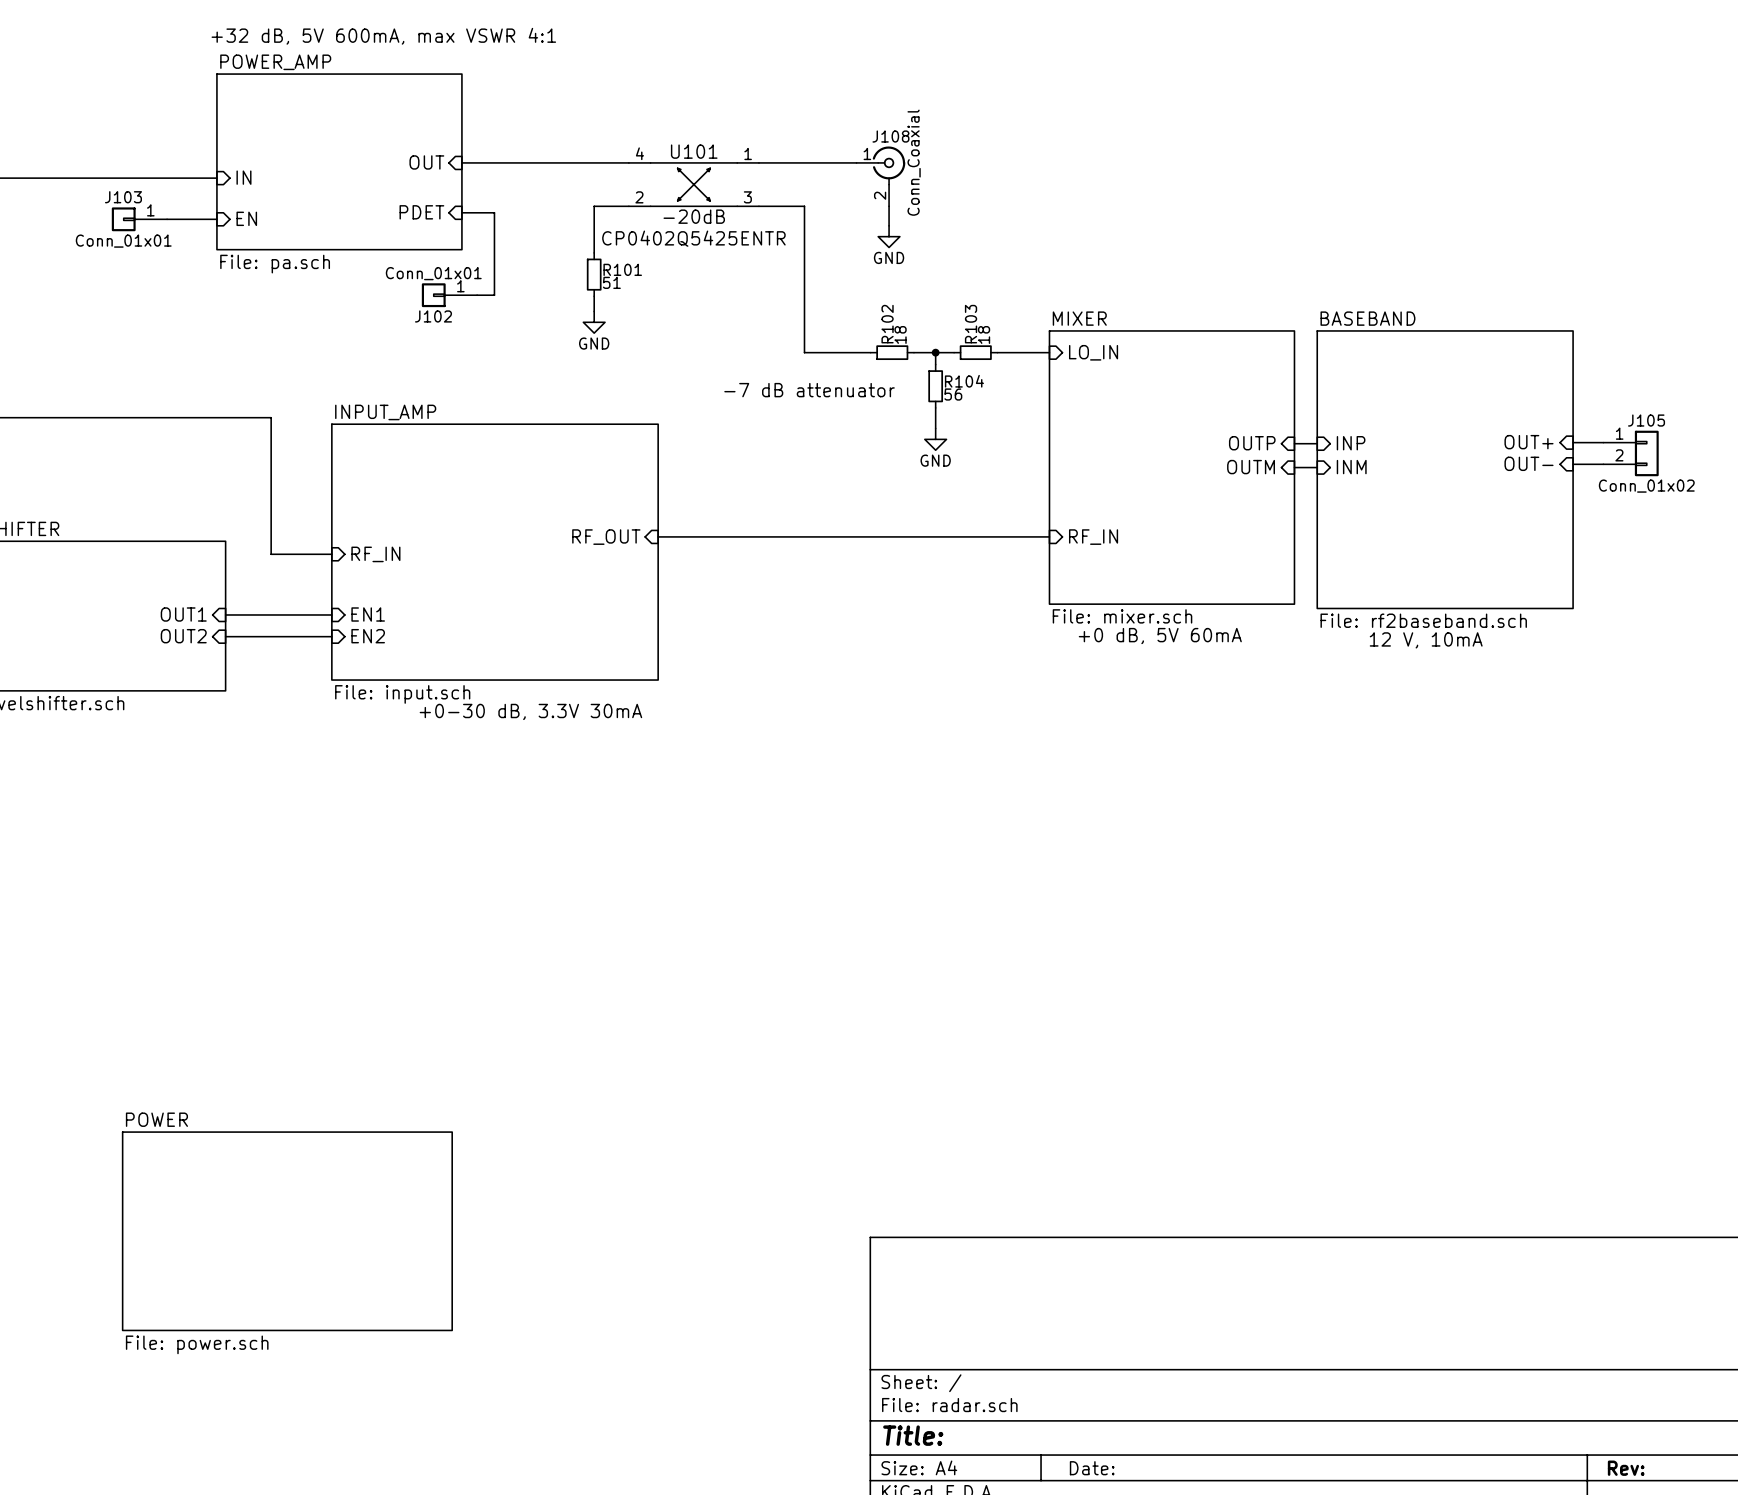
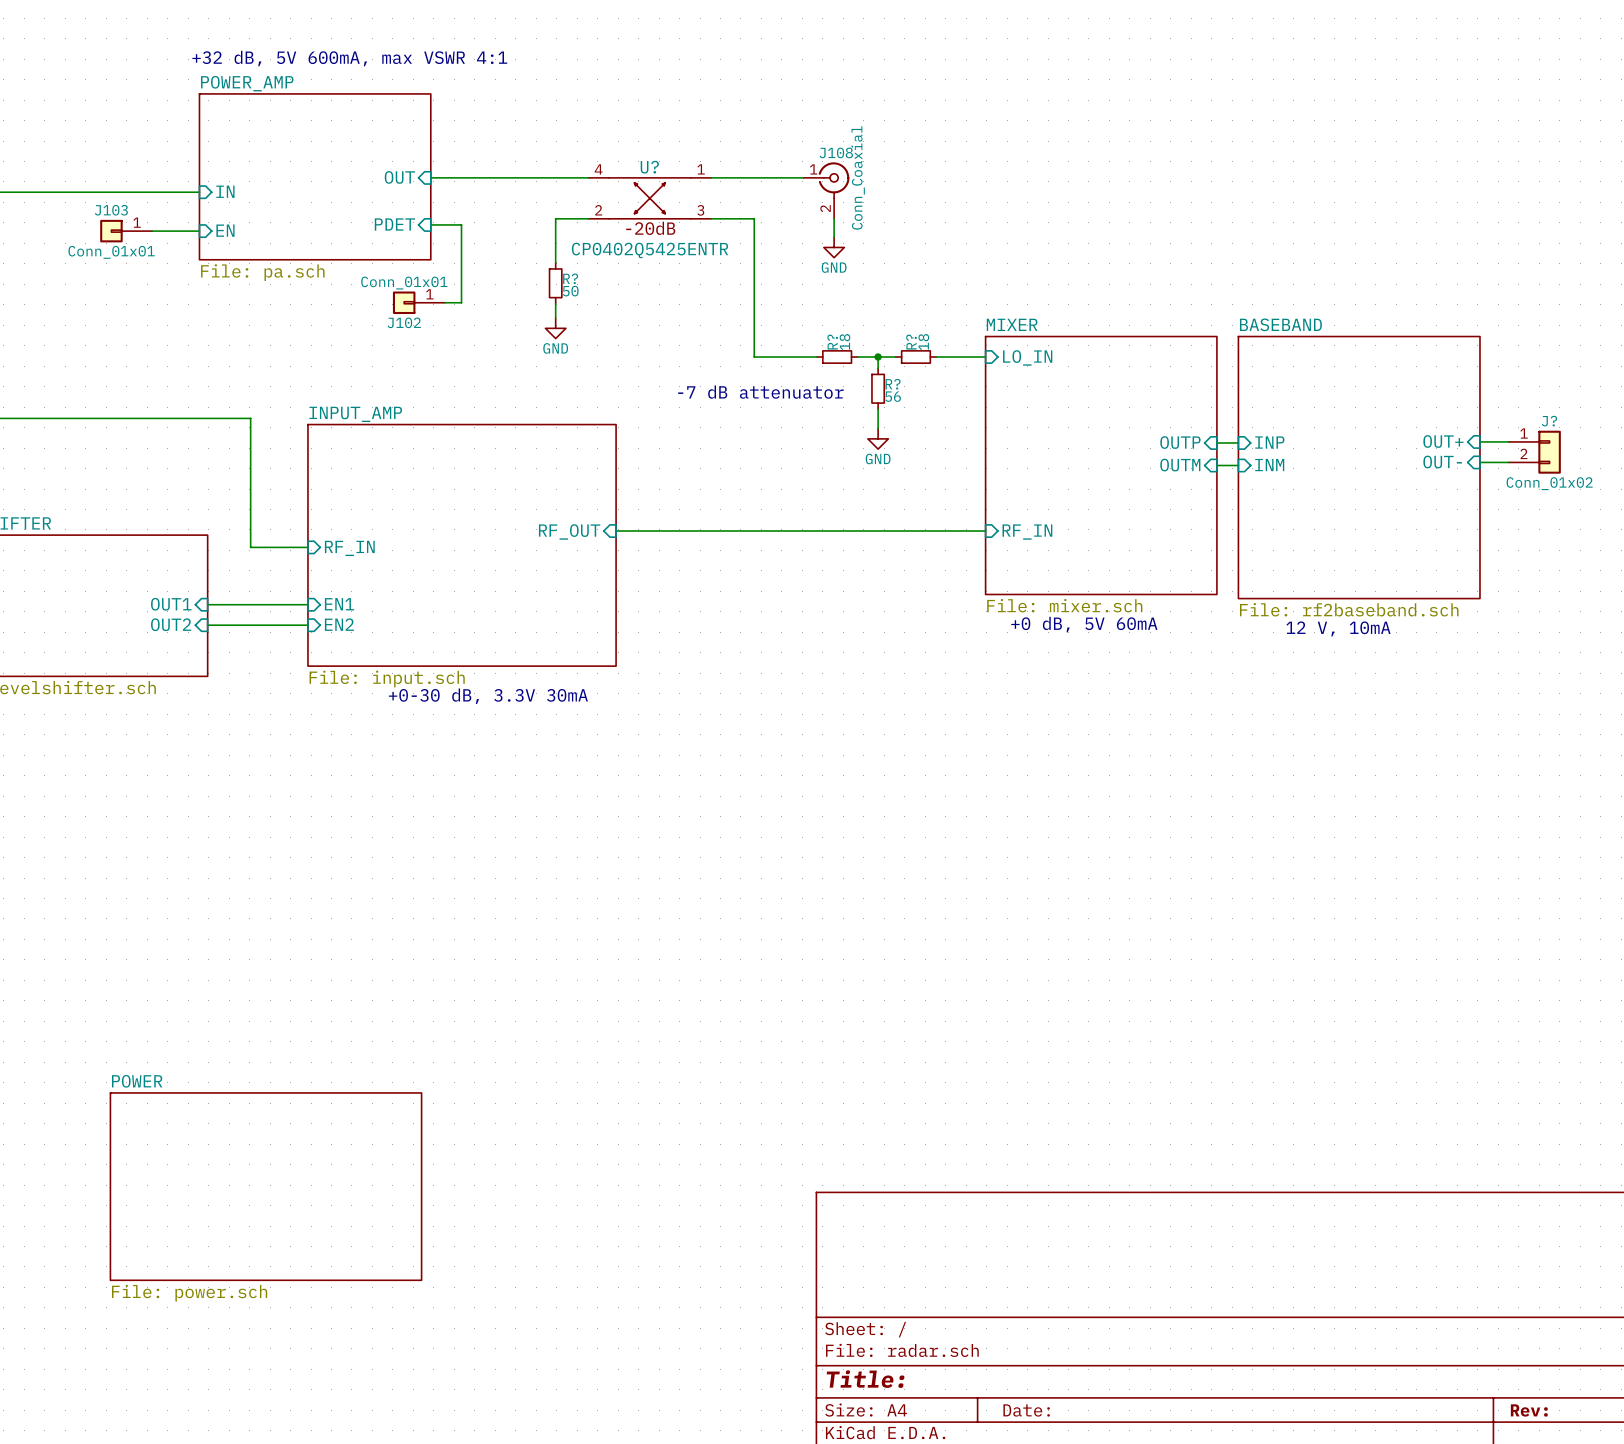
U101 name: U101 (694, 151) -> U? (649, 167)
R101 name: R101 (622, 269) -> R? (570, 278)
R101 value: 51 (611, 282) -> 50 (570, 291)
R102 name: R102 (887, 324) -> R? (832, 342)
R103 name: R103 (971, 324) -> R? (911, 342)
R104 name: R104 (964, 381) -> R? (893, 384)
J105 name: J105 (1646, 420) -> J? (1549, 421)

